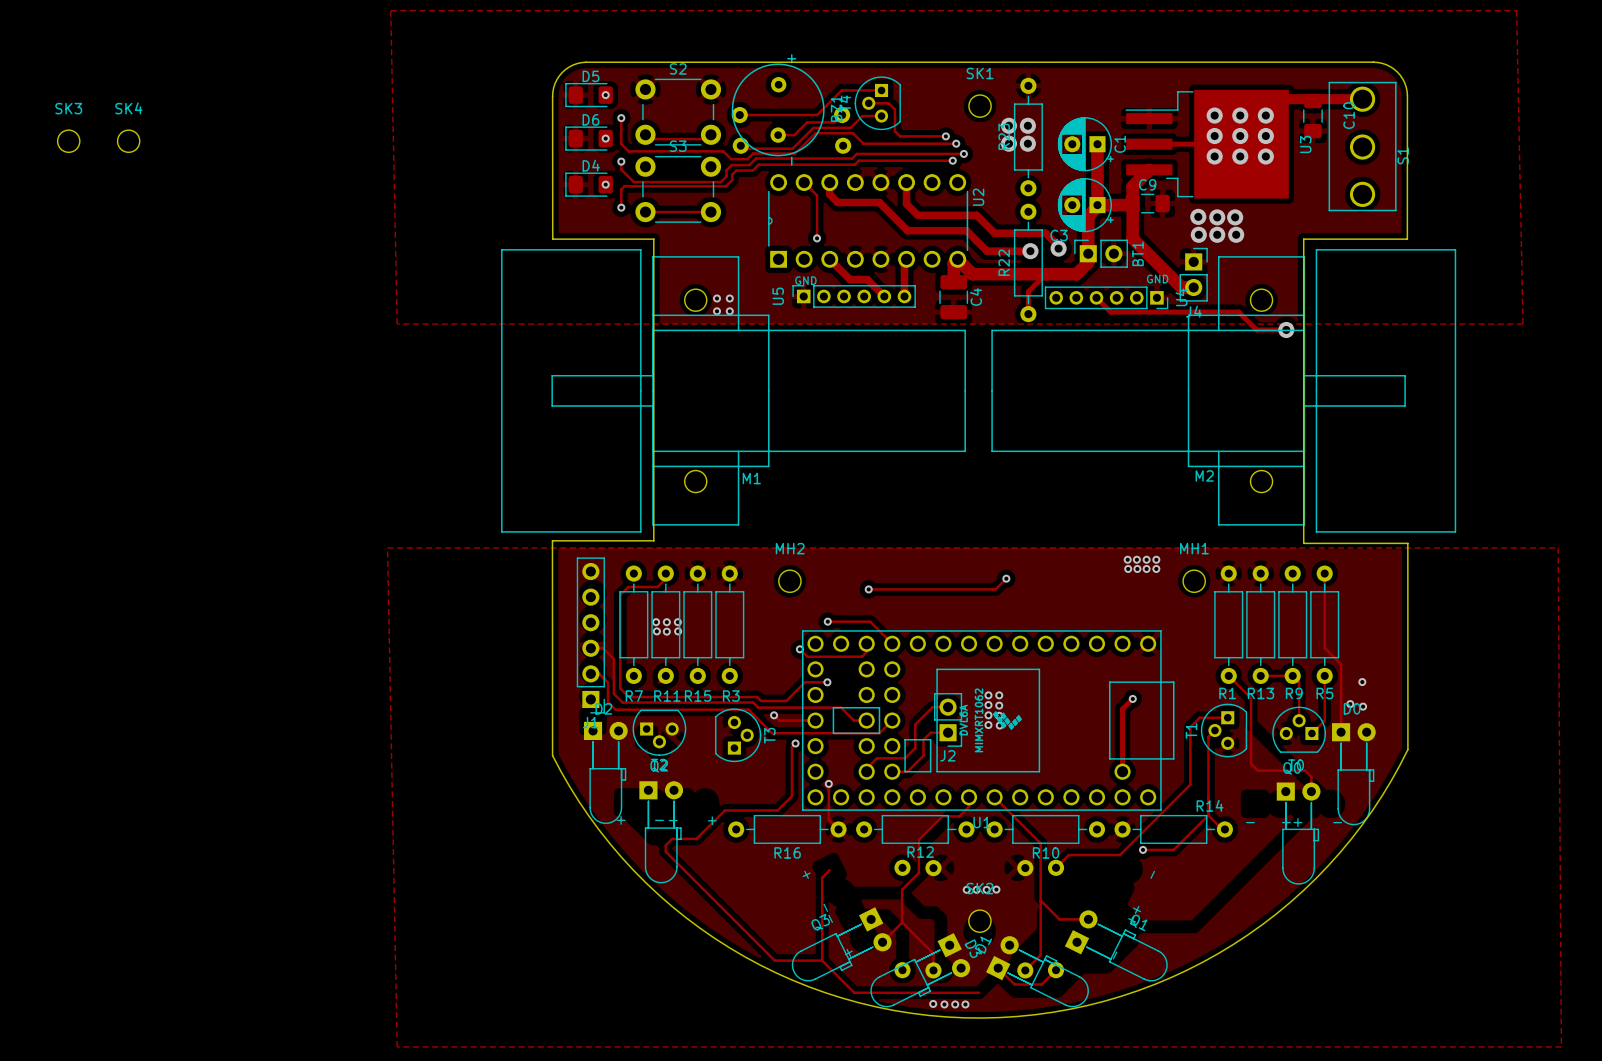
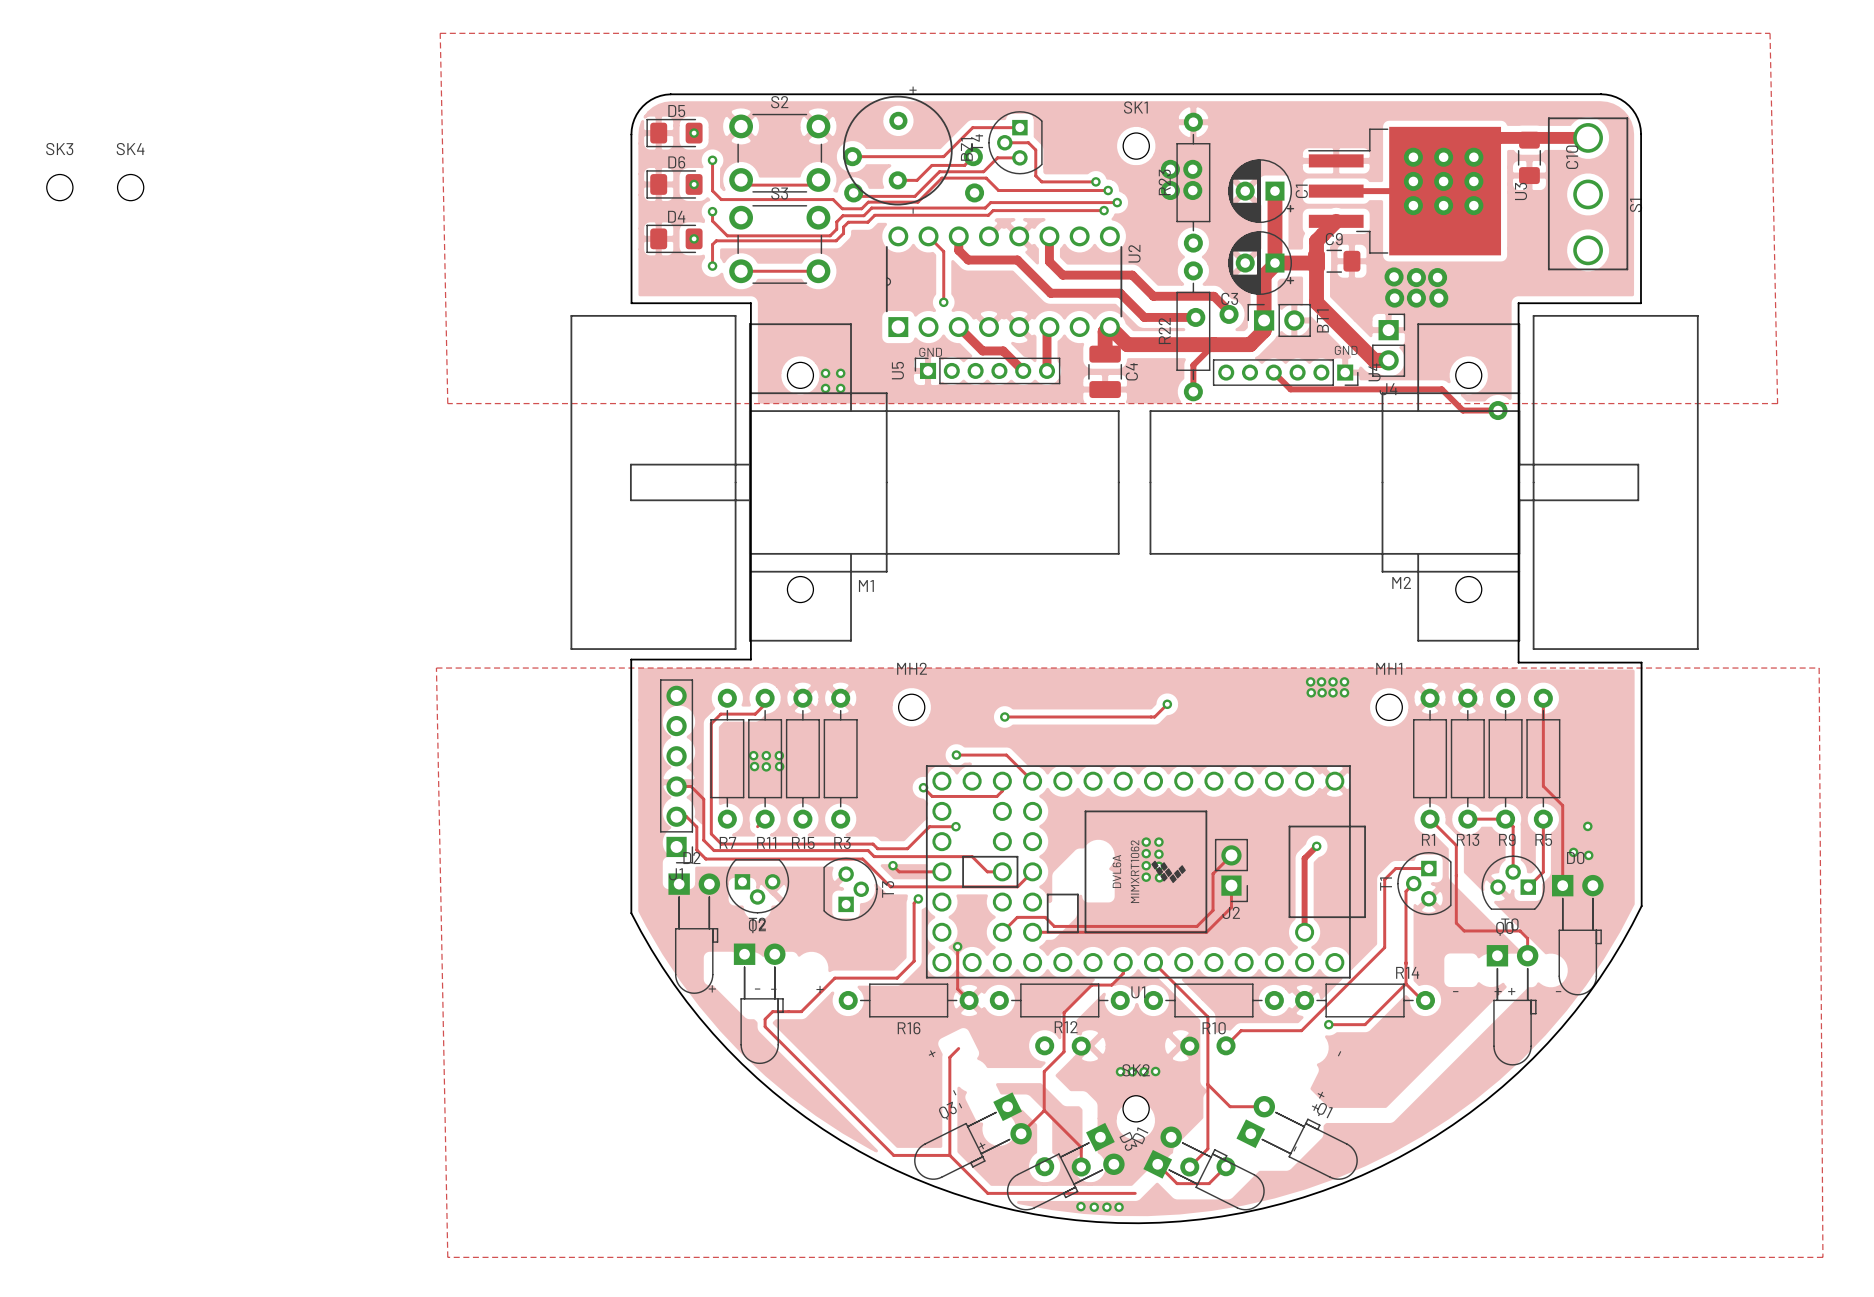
track: (948, 707) (932, 707) (915, 724) (915, 748) (905, 758) (876, 758) (866, 768) (866, 771) -> (1231, 855) (1213, 873) (1213, 910) (1197, 926) (1054, 926) (1045, 917) (1017, 917) (1002, 932)
J2 position: (948, 719) -> (1231, 870)
track: (948, 732) (930, 732) (923, 739) (923, 755) (907, 771) -> (1231, 885) (1231, 907) (1206, 932) (1050, 932)

